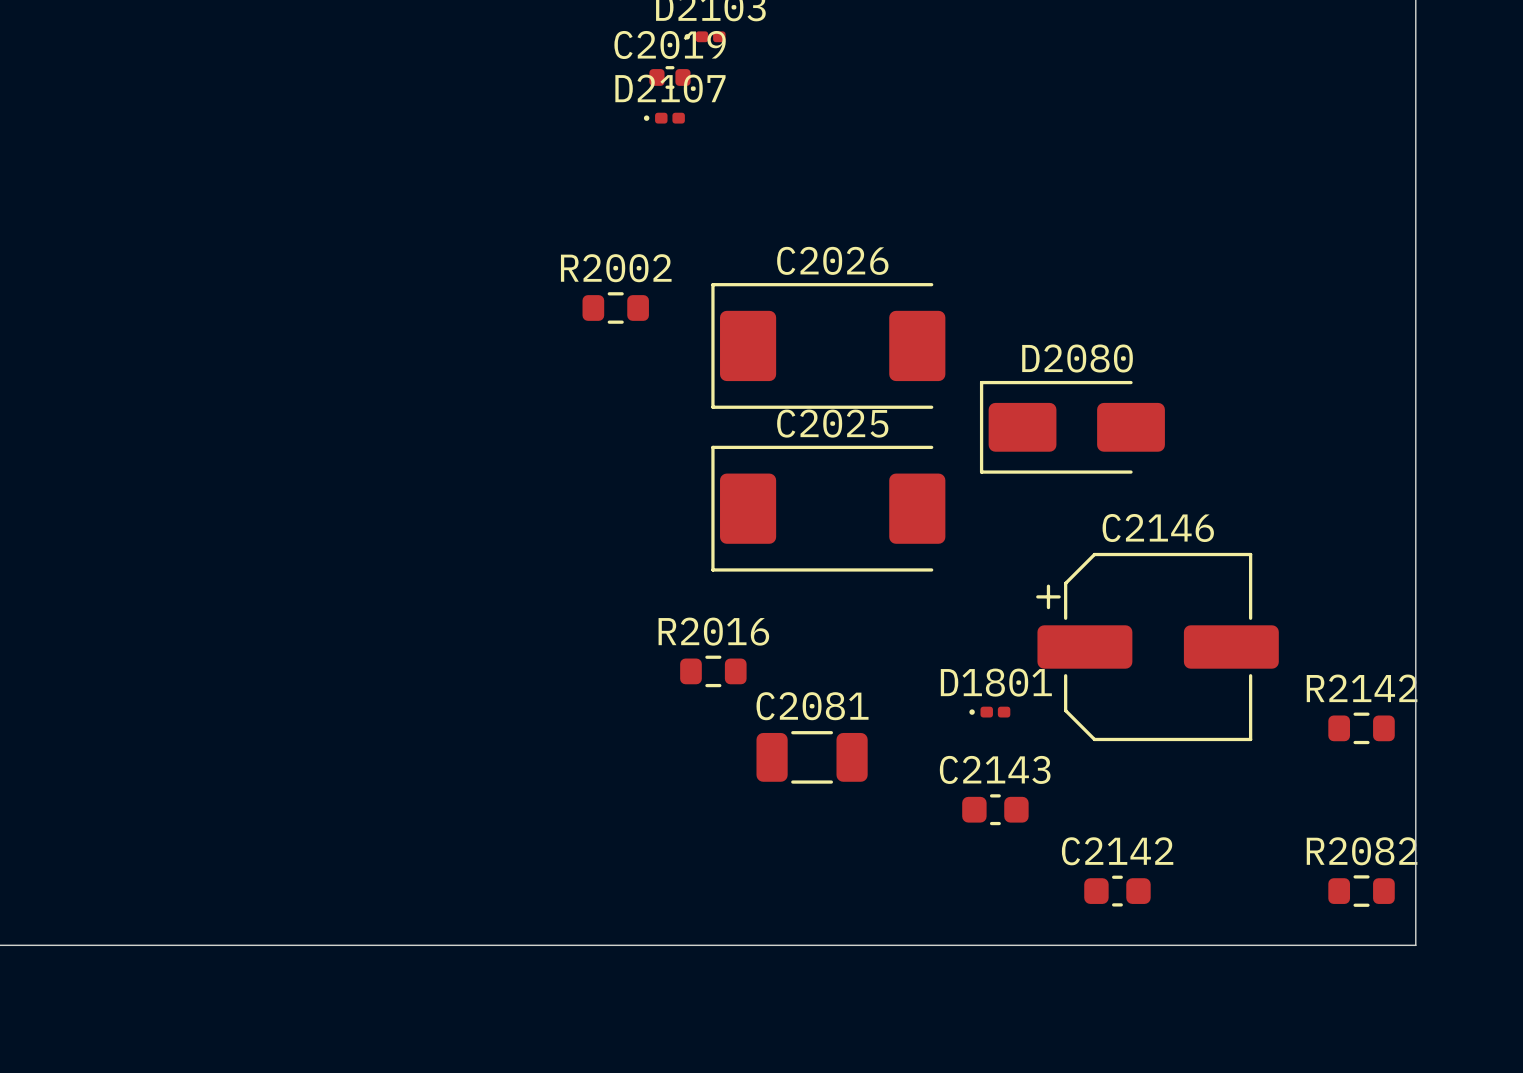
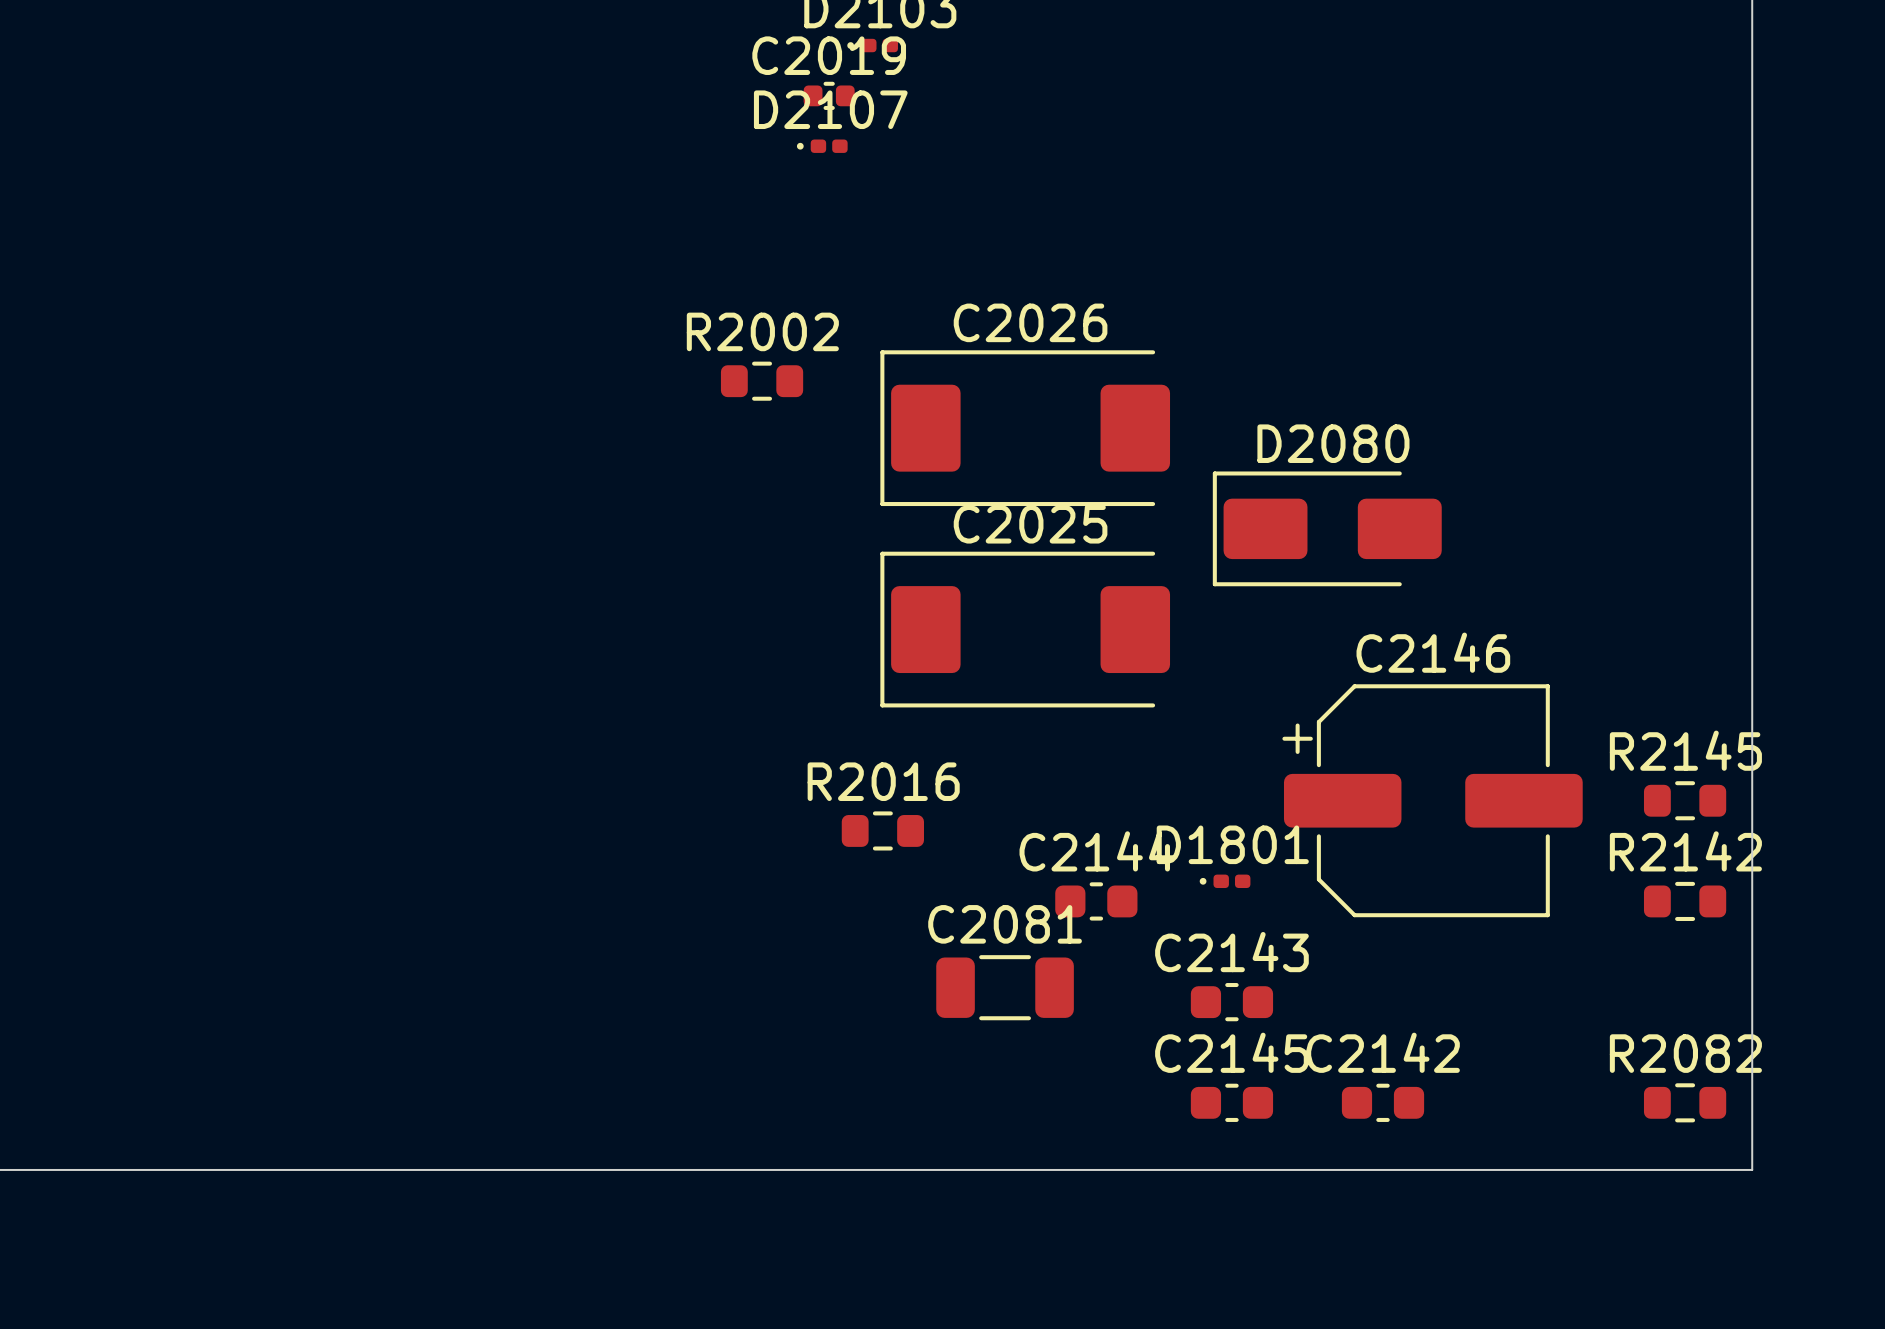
R2145: none -> (1685, 800)
C2144: none -> (1096, 901)
C2081 position: (812, 757) -> (1005, 987)
C2145: none -> (1231, 1102)

